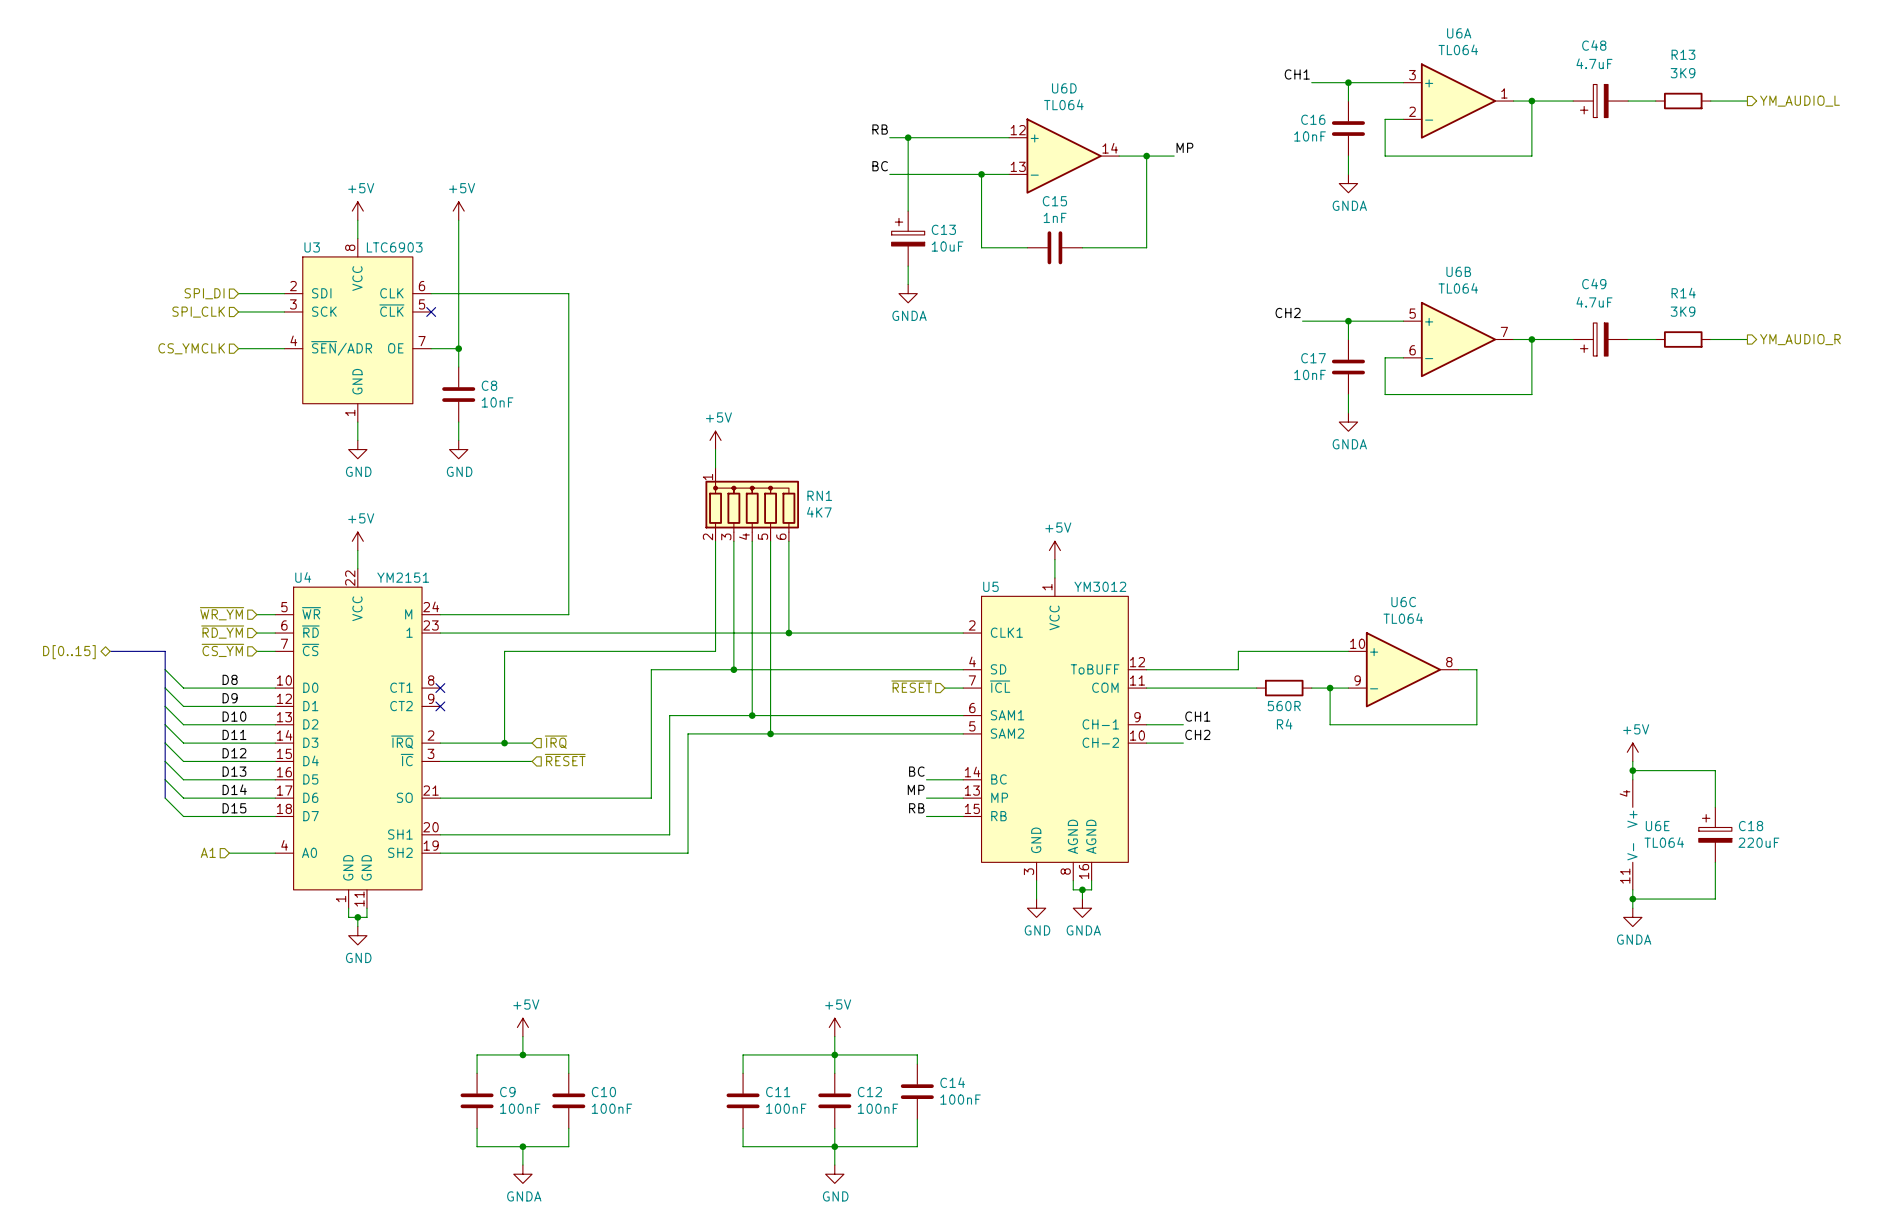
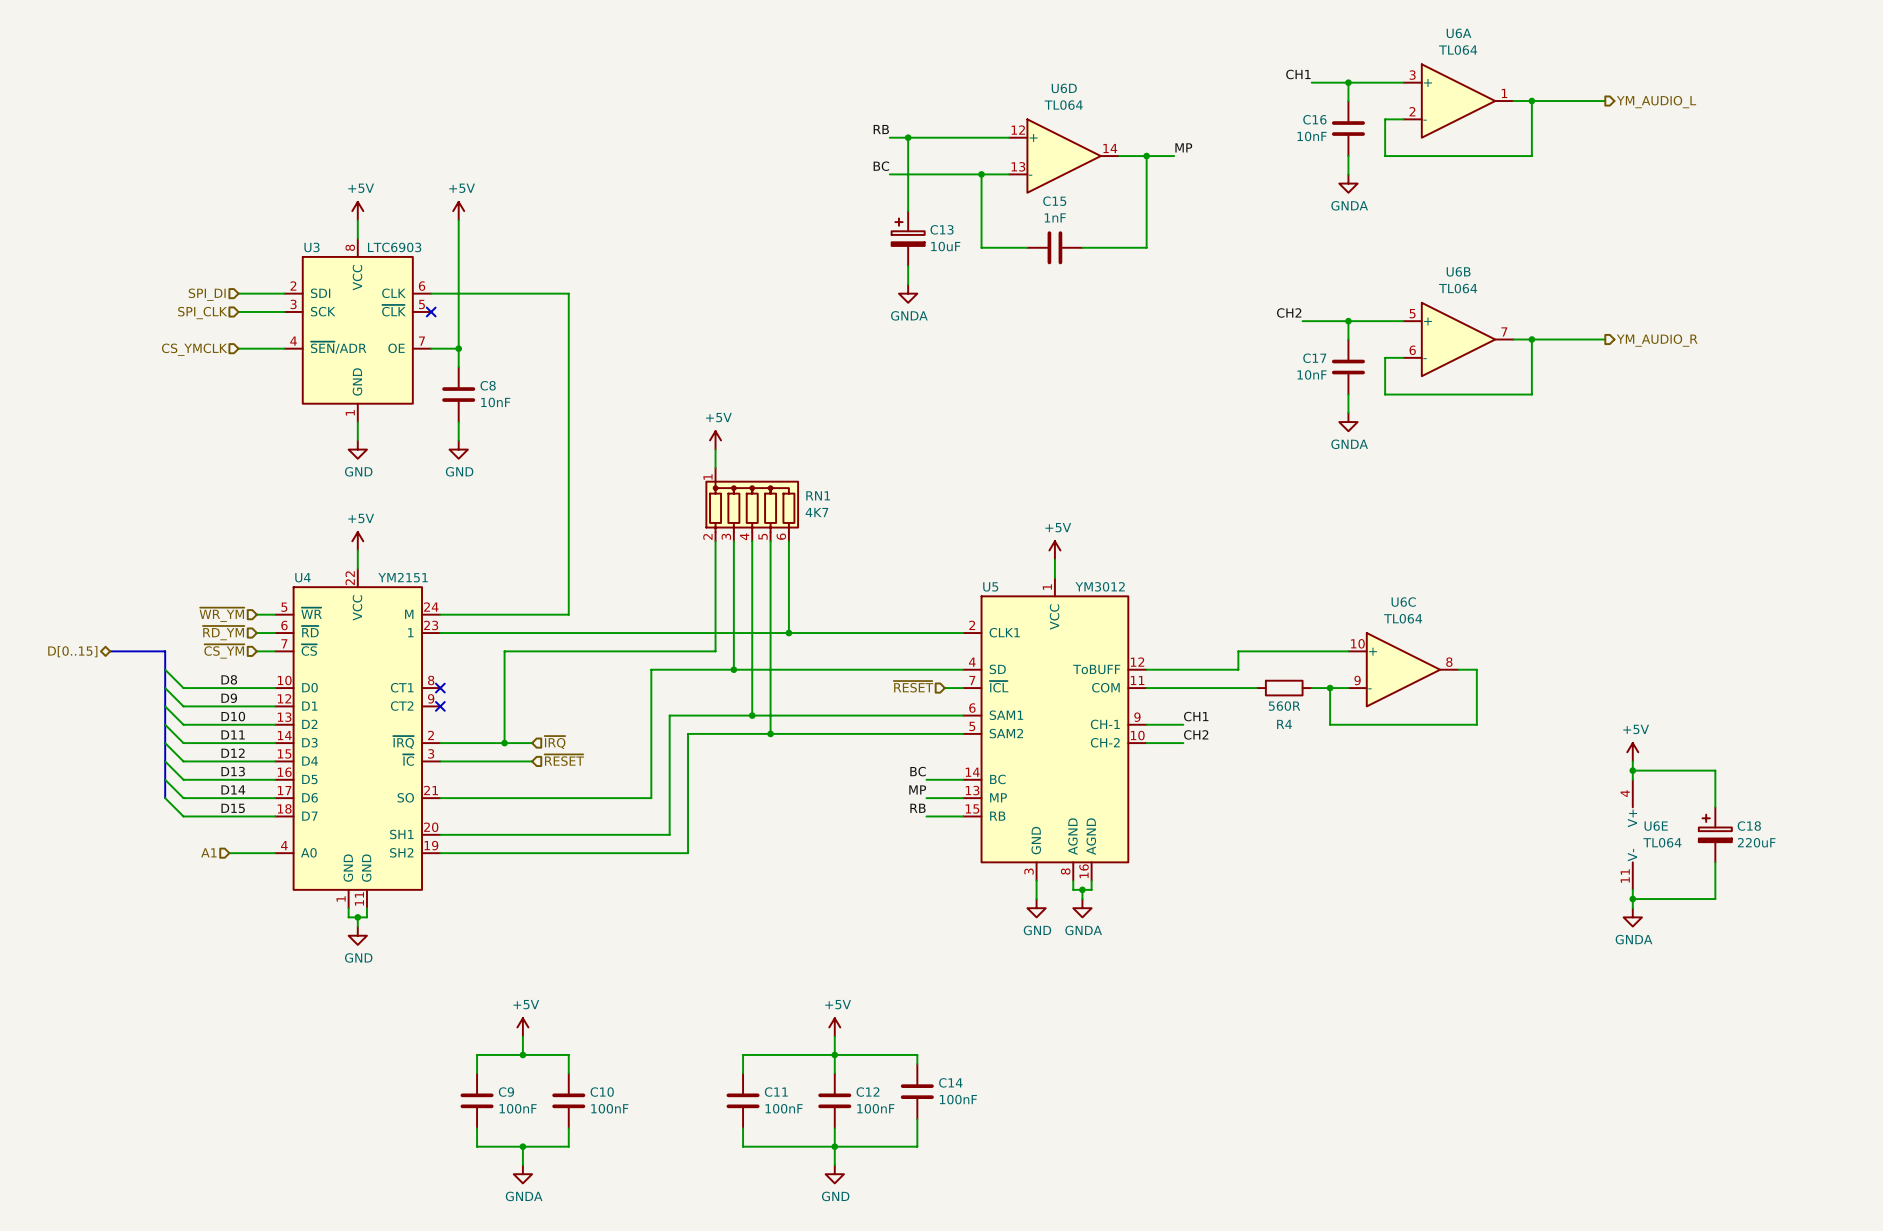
C48: 4.7uF (1600, 101) -> none
wire: (1628, 101) (1655, 101) -> none
R13: 3K9 (1683, 101) -> none
wire: (1710, 101) (1747, 101) -> none
hierarchical label position: YM_AUDIO_L (1800, 101) -> YM_AUDIO_L (1656, 102)
C49: 4.7uF (1600, 339) -> none
wire: (1628, 339) (1655, 339) -> none
R14: 3K9 (1683, 339) -> none
wire: (1710, 339) (1747, 339) -> none
hierarchical label position: YM_AUDIO_R (1800, 339) -> YM_AUDIO_R (1657, 340)

